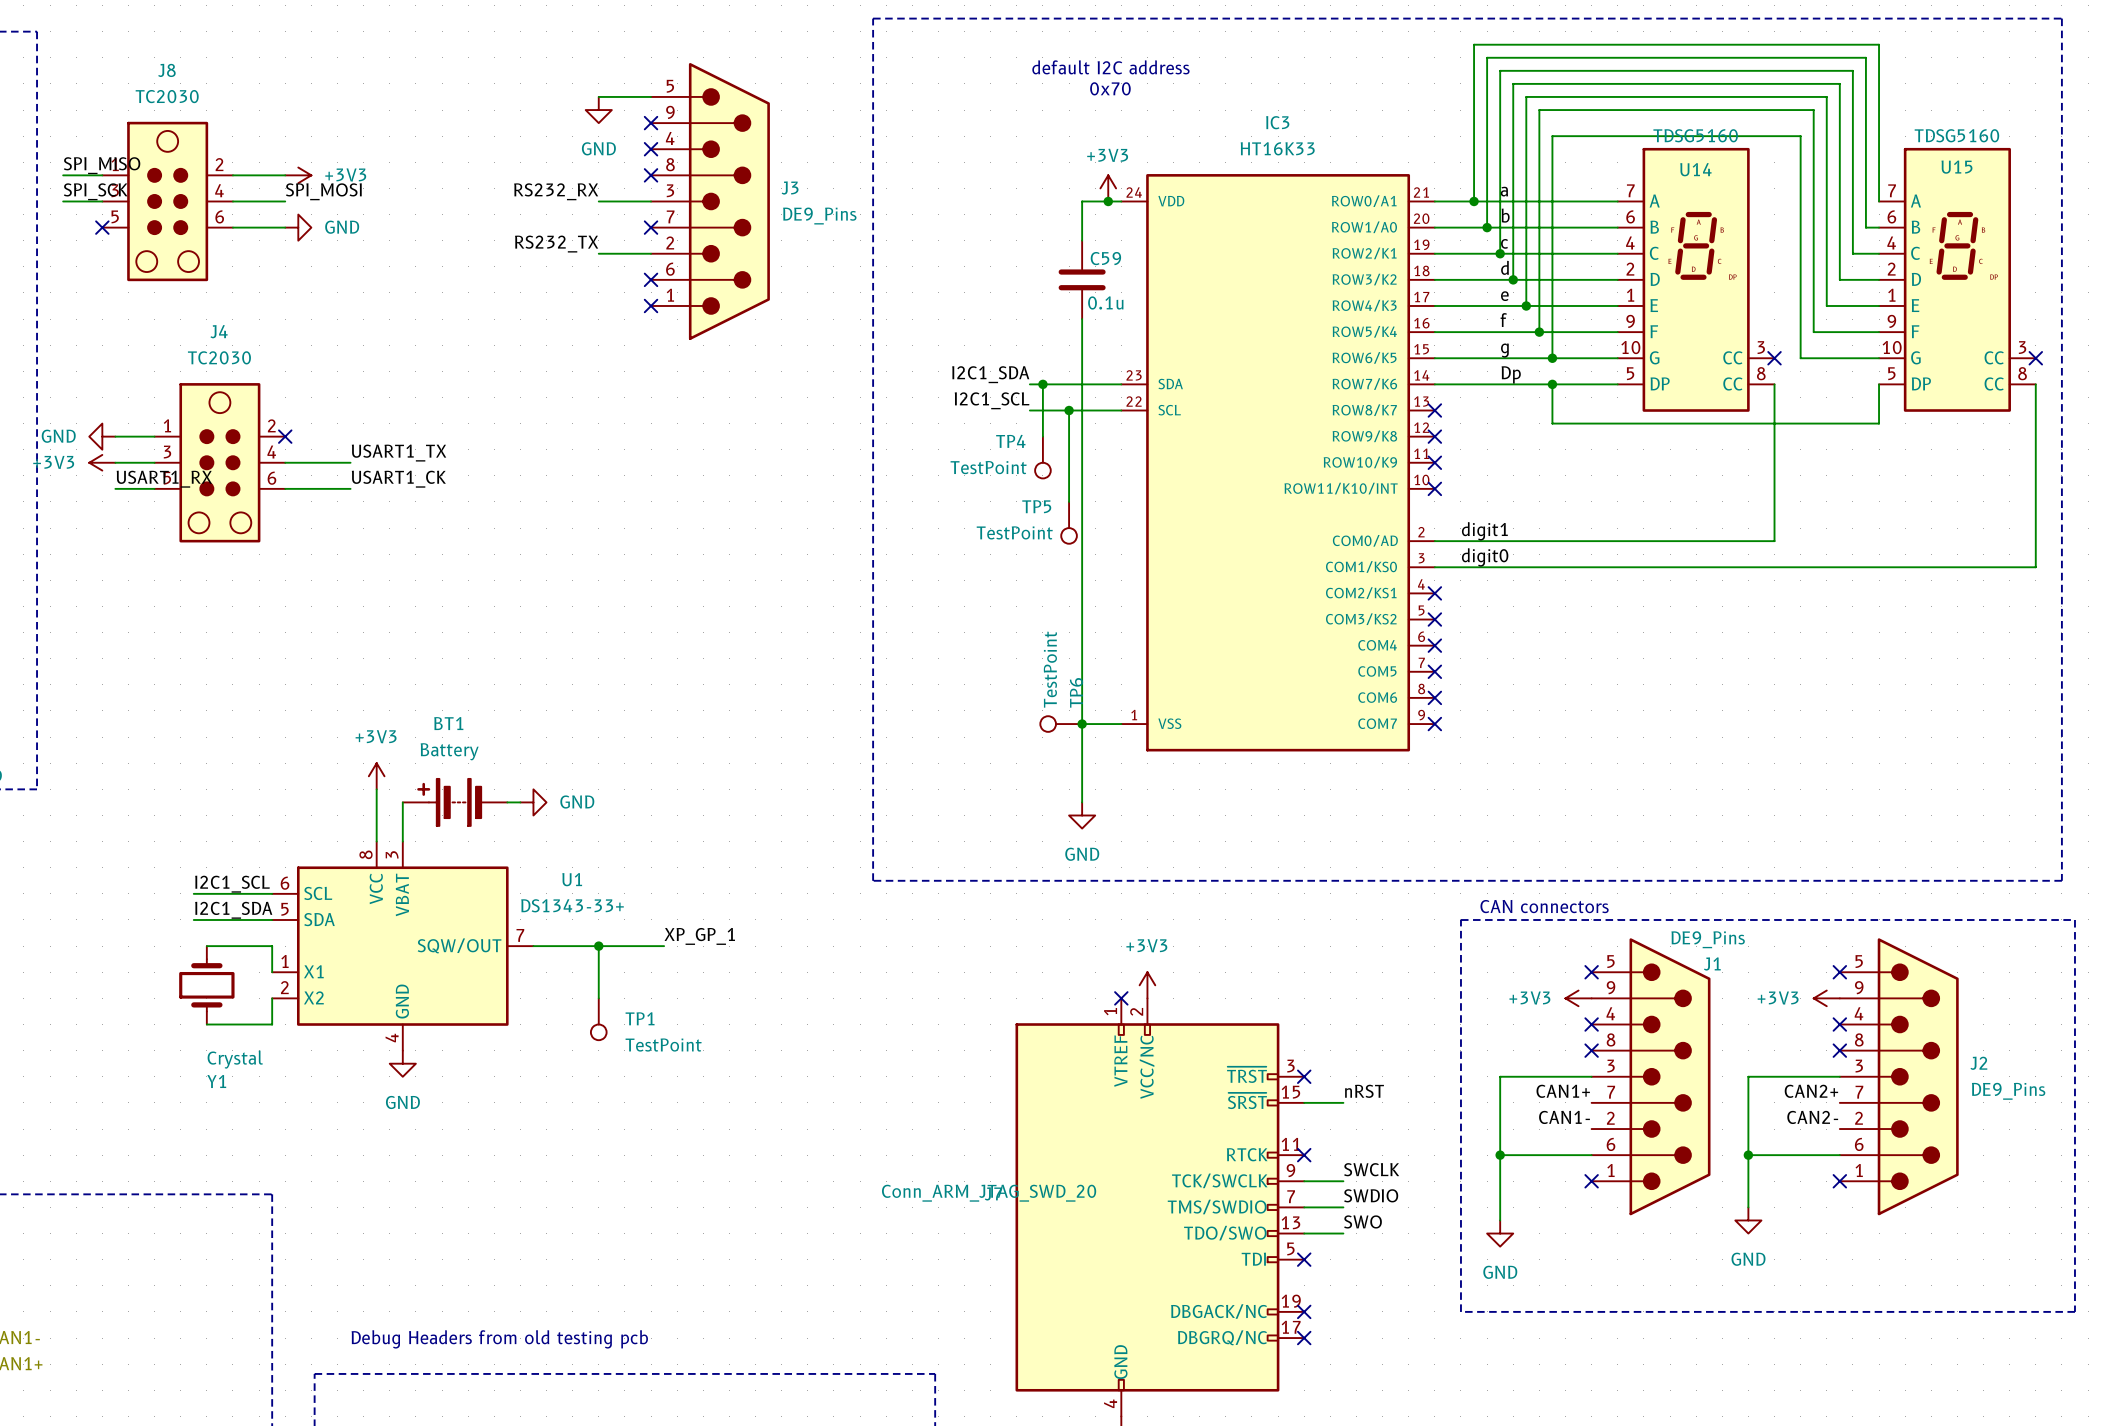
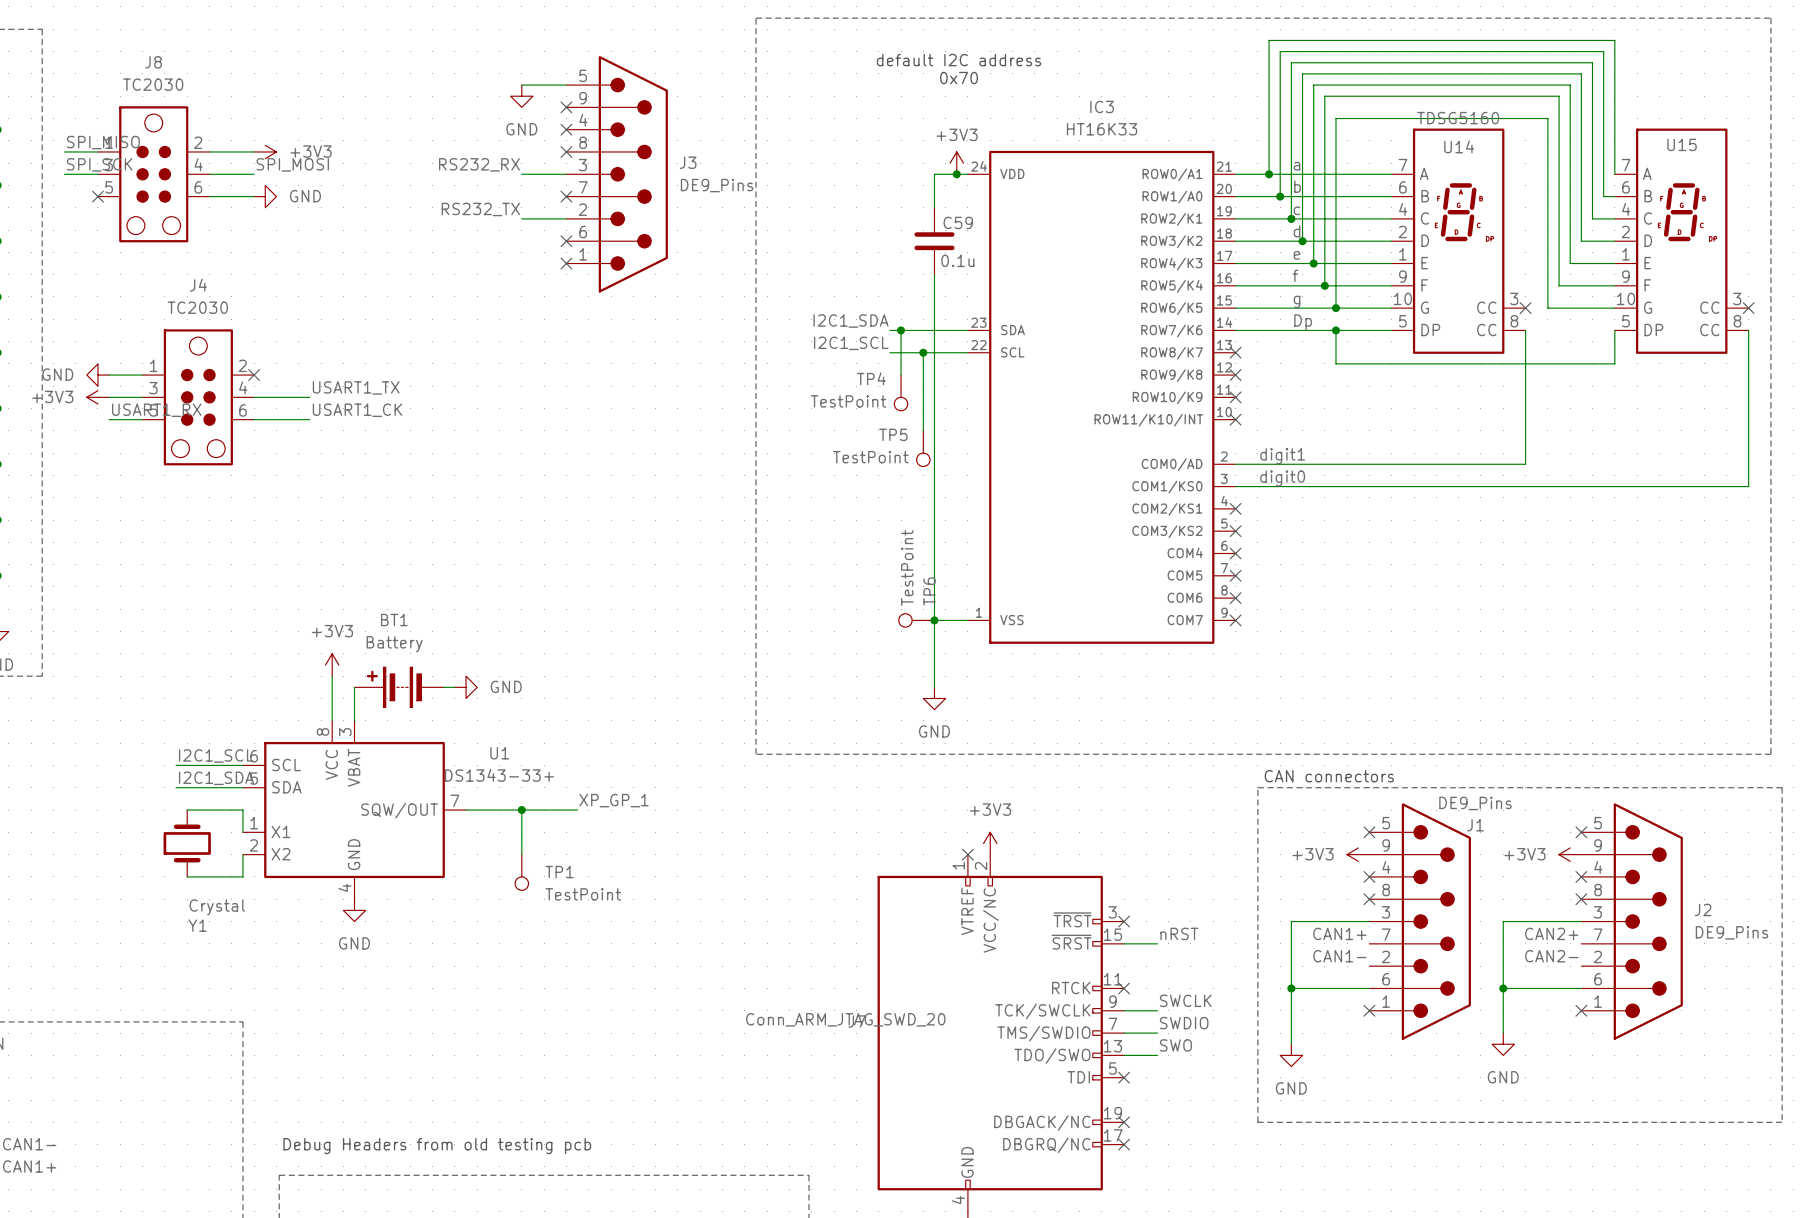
U15 value: TDSG5160 (1956, 135) -> none

